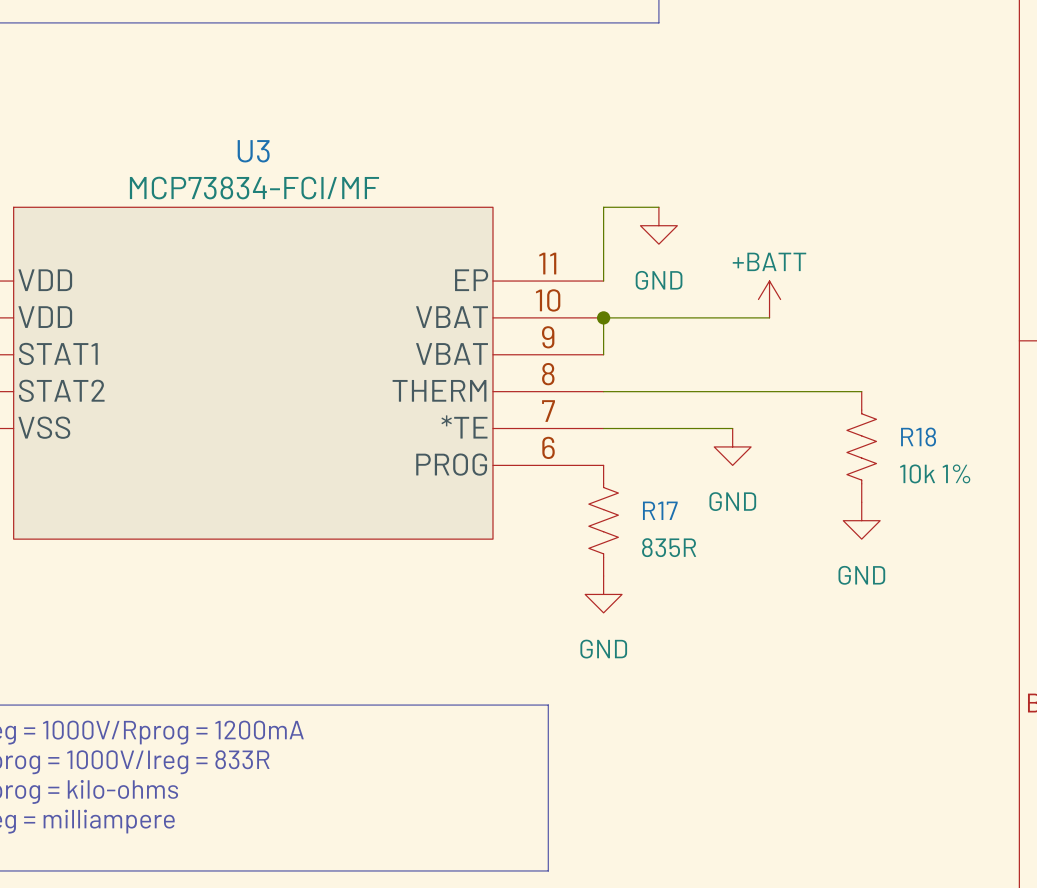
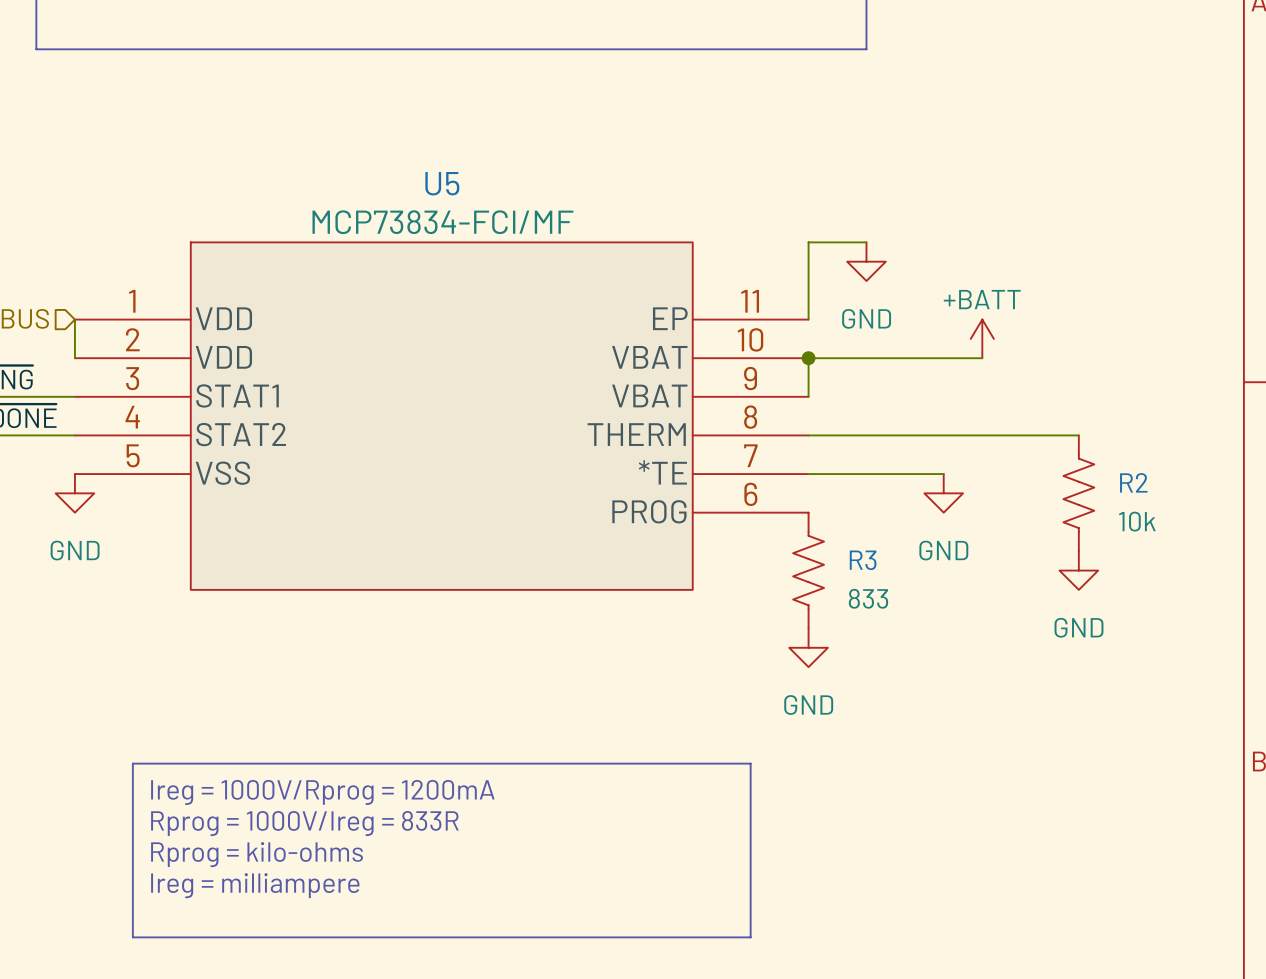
U3 name: U3 (253, 151) -> U5 (442, 183)
R18 name: R18 (918, 437) -> R2 (1133, 482)
R18 value: 10k 1% (935, 473) -> 10k (1137, 521)
R17 name: R17 (660, 510) -> R3 (863, 560)
R17 value: 835R (669, 547) -> 833 (868, 598)

